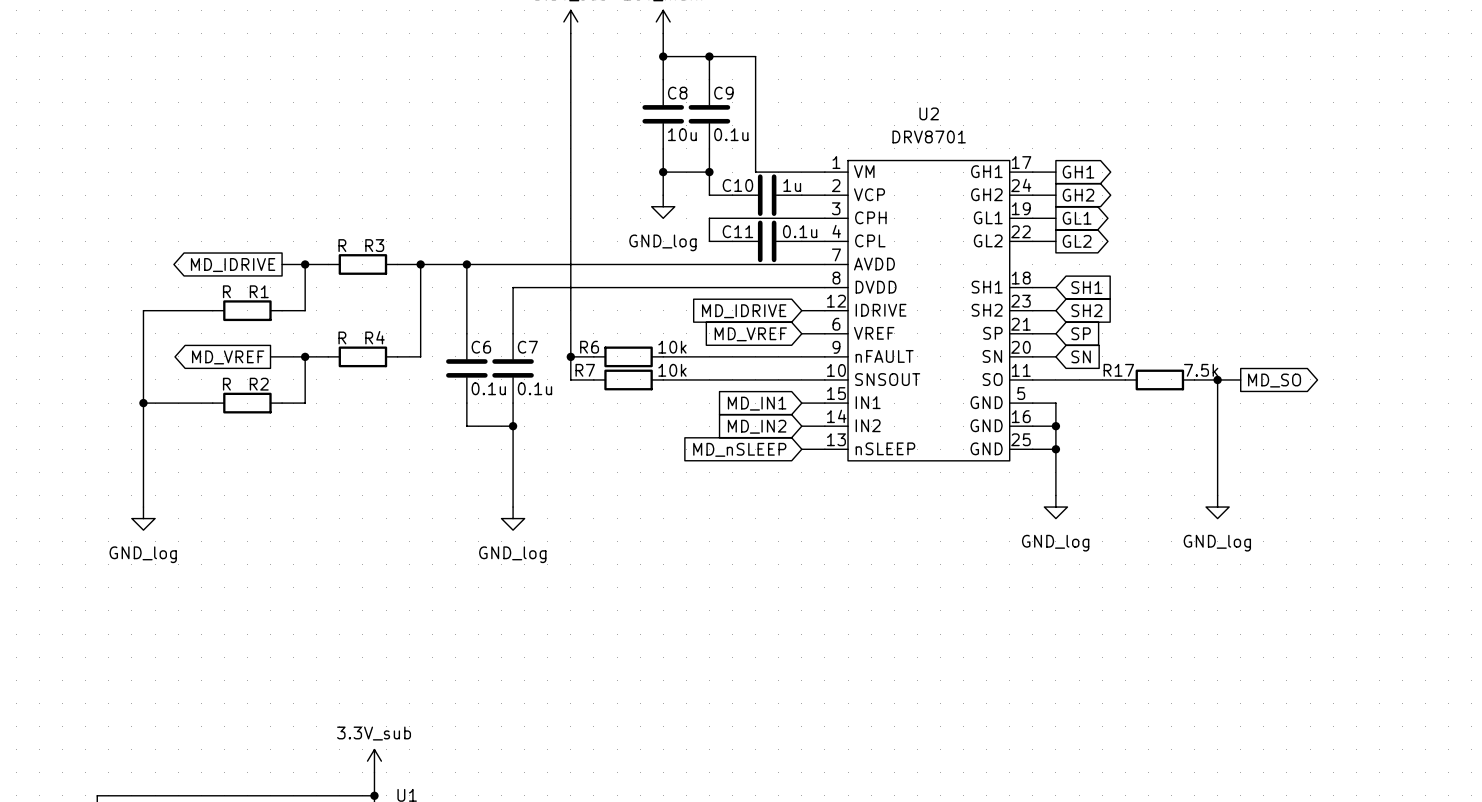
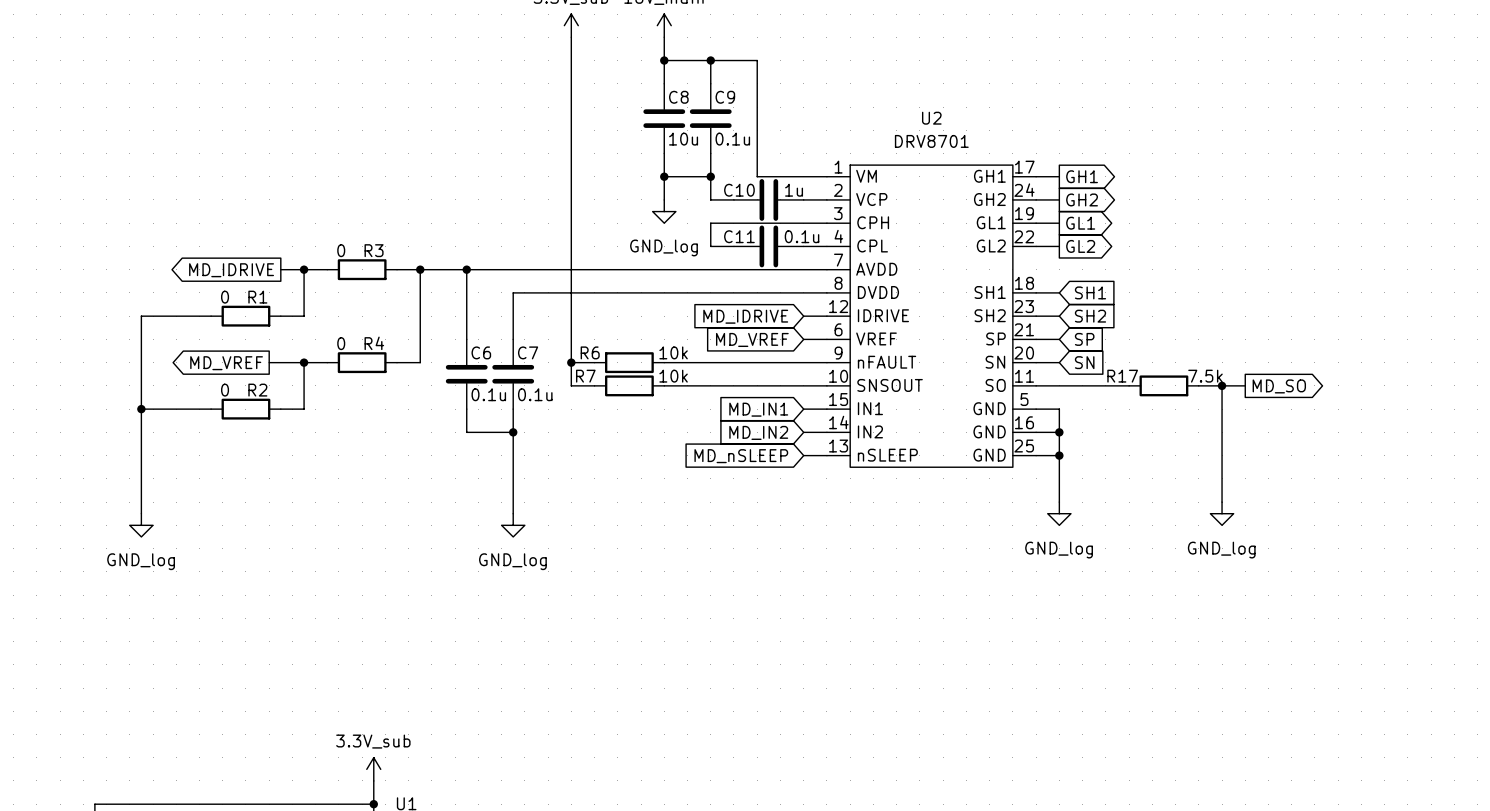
R3 value: R (342, 245) -> 0 (341, 250)
R1 value: R (226, 291) -> 0 (225, 297)
R4 value: R (342, 337) -> 0 (341, 343)
R2 value: R (226, 384) -> 0 (225, 390)

